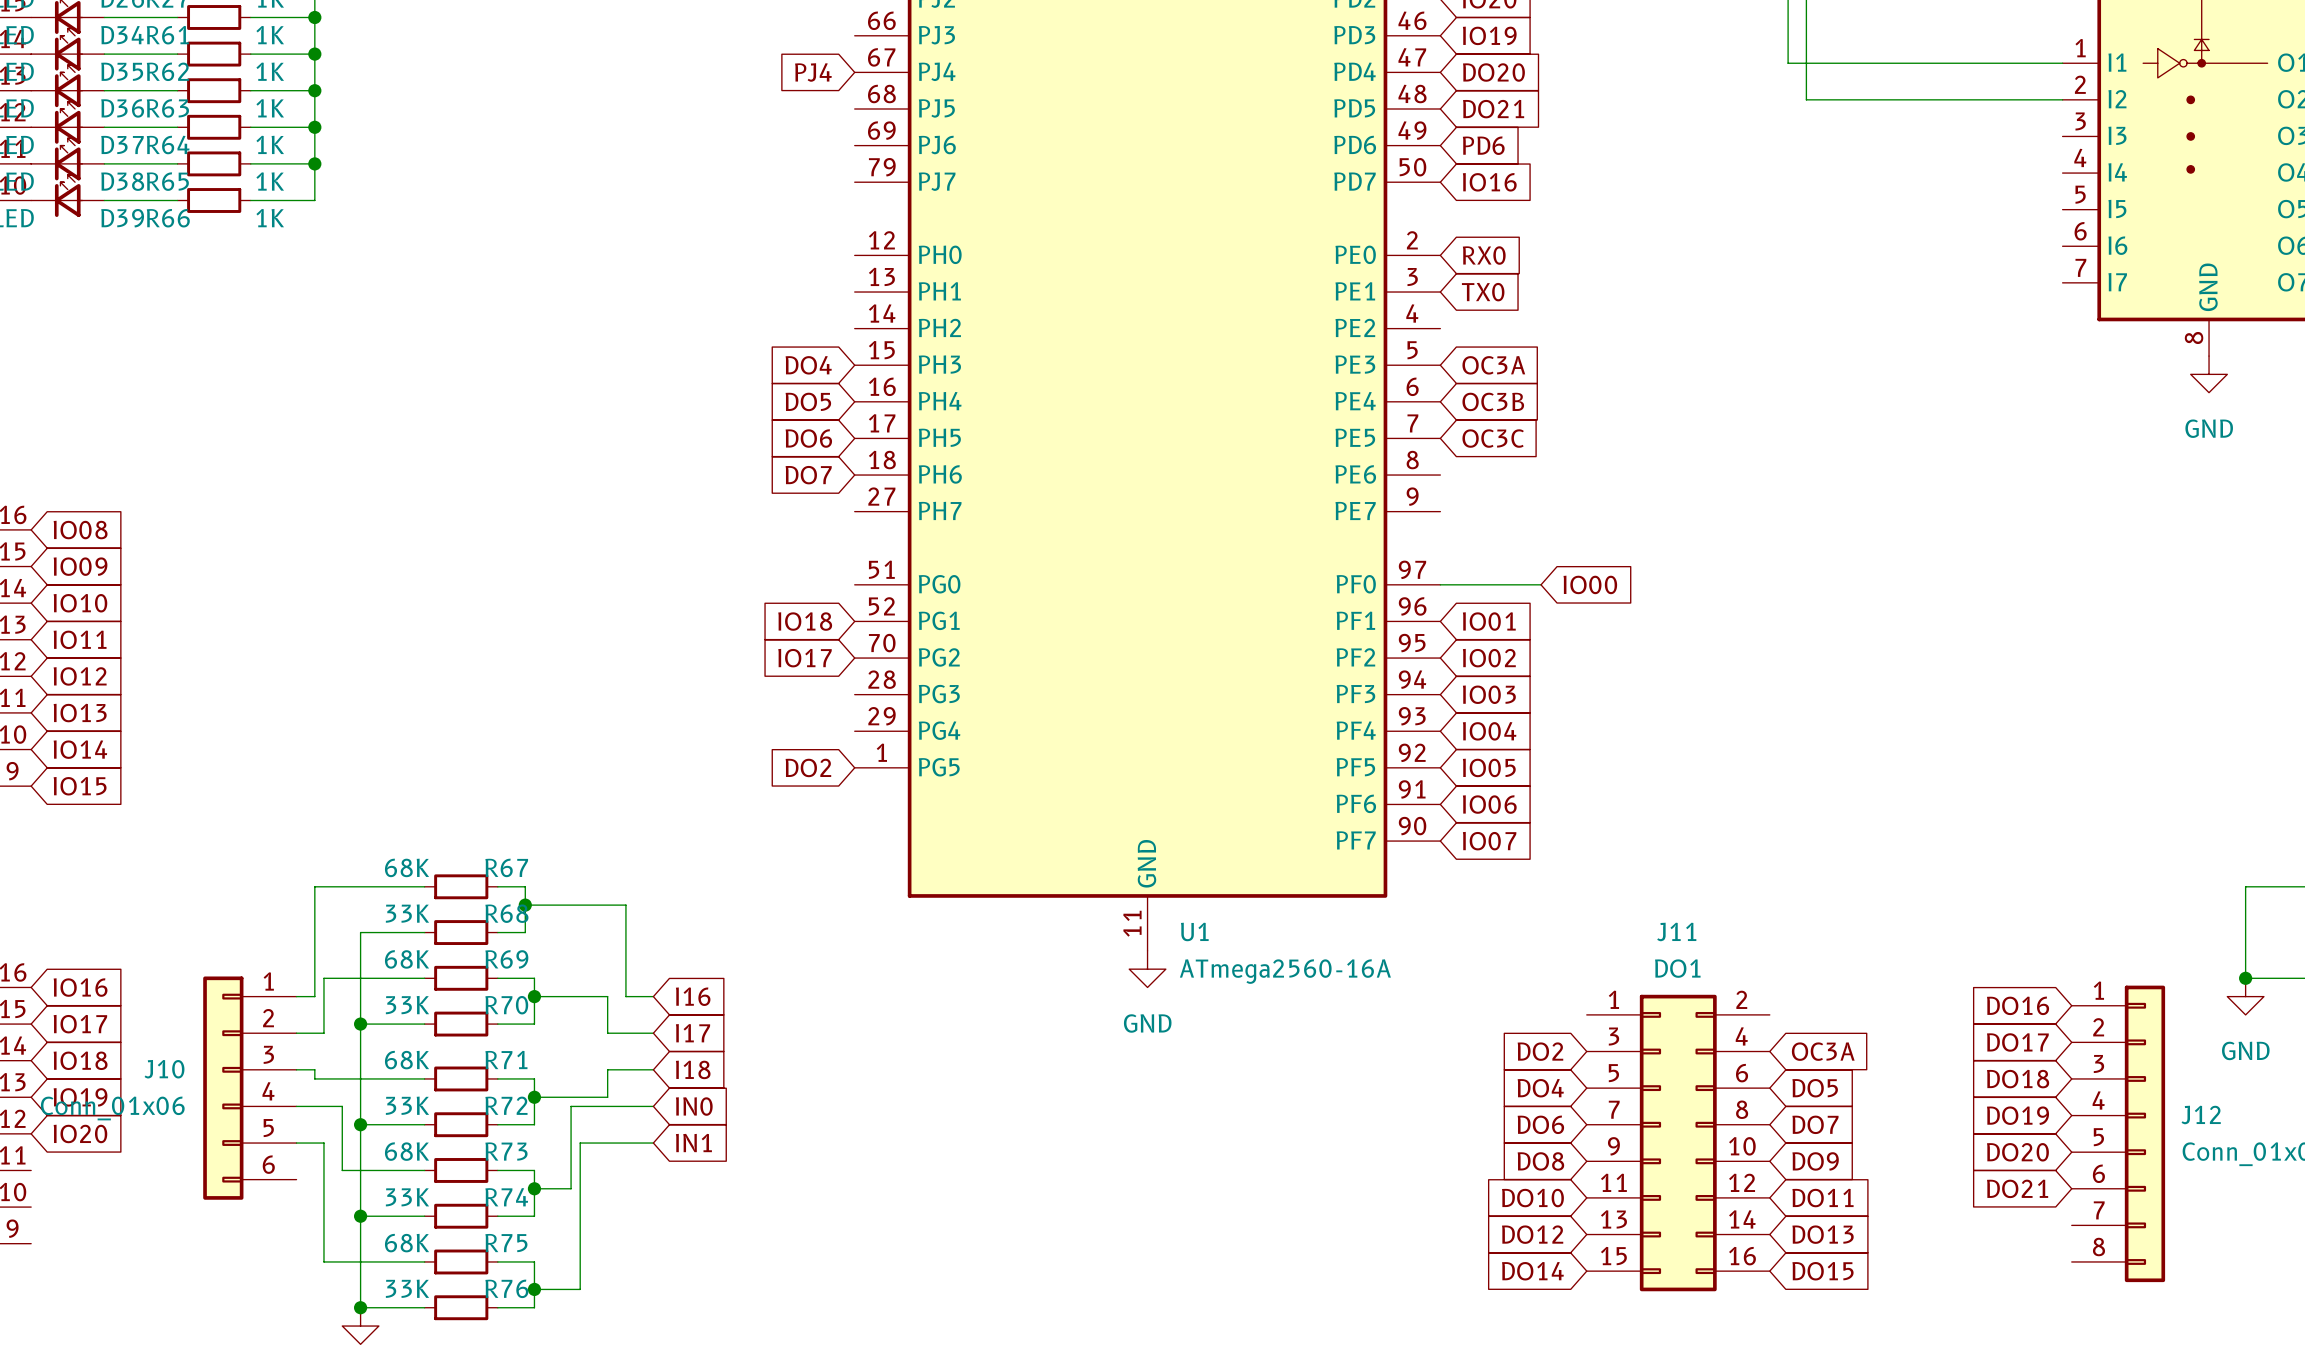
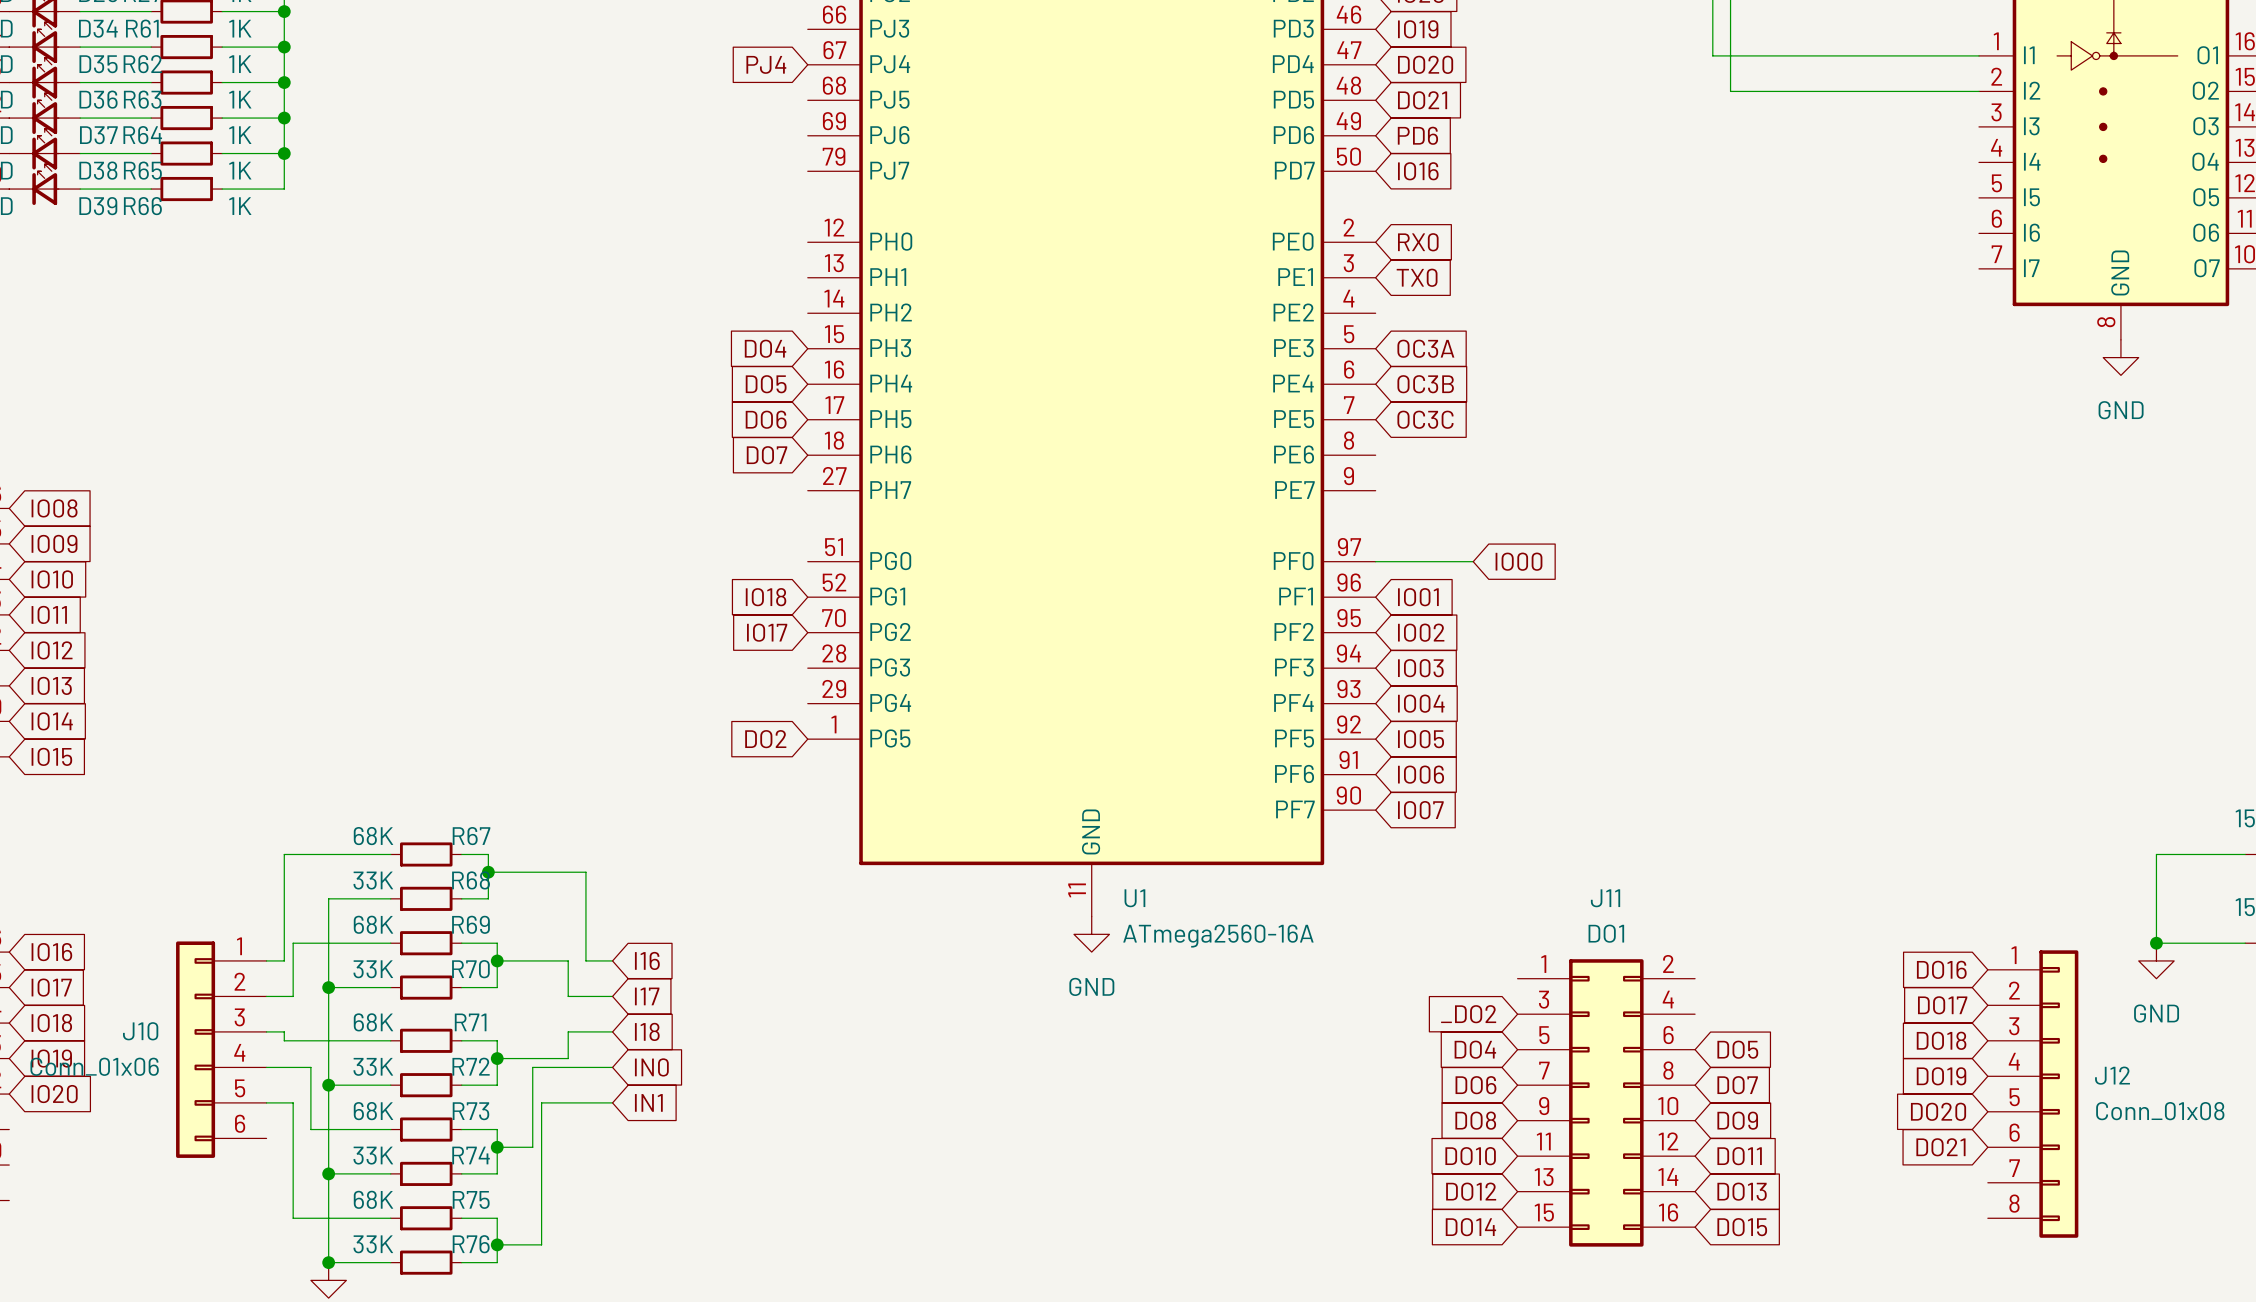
global label: DO2 (1540, 1051) -> _DO2 (1468, 1014)
global label: OC3A (1823, 1051) -> none

